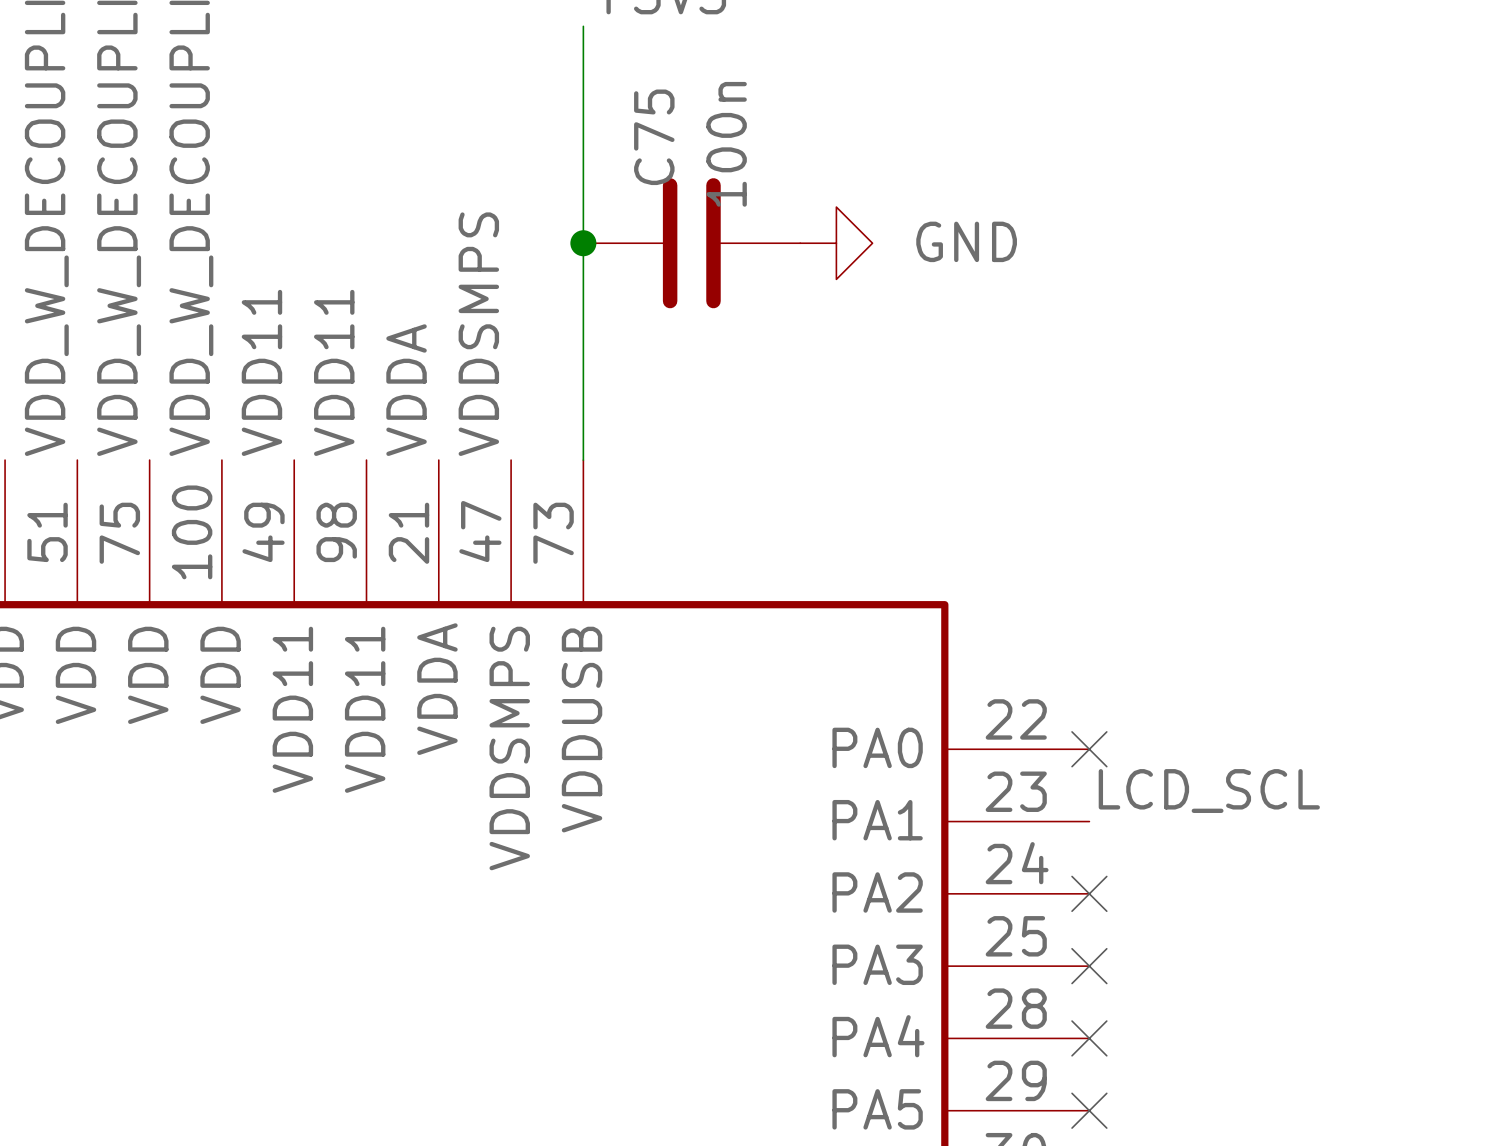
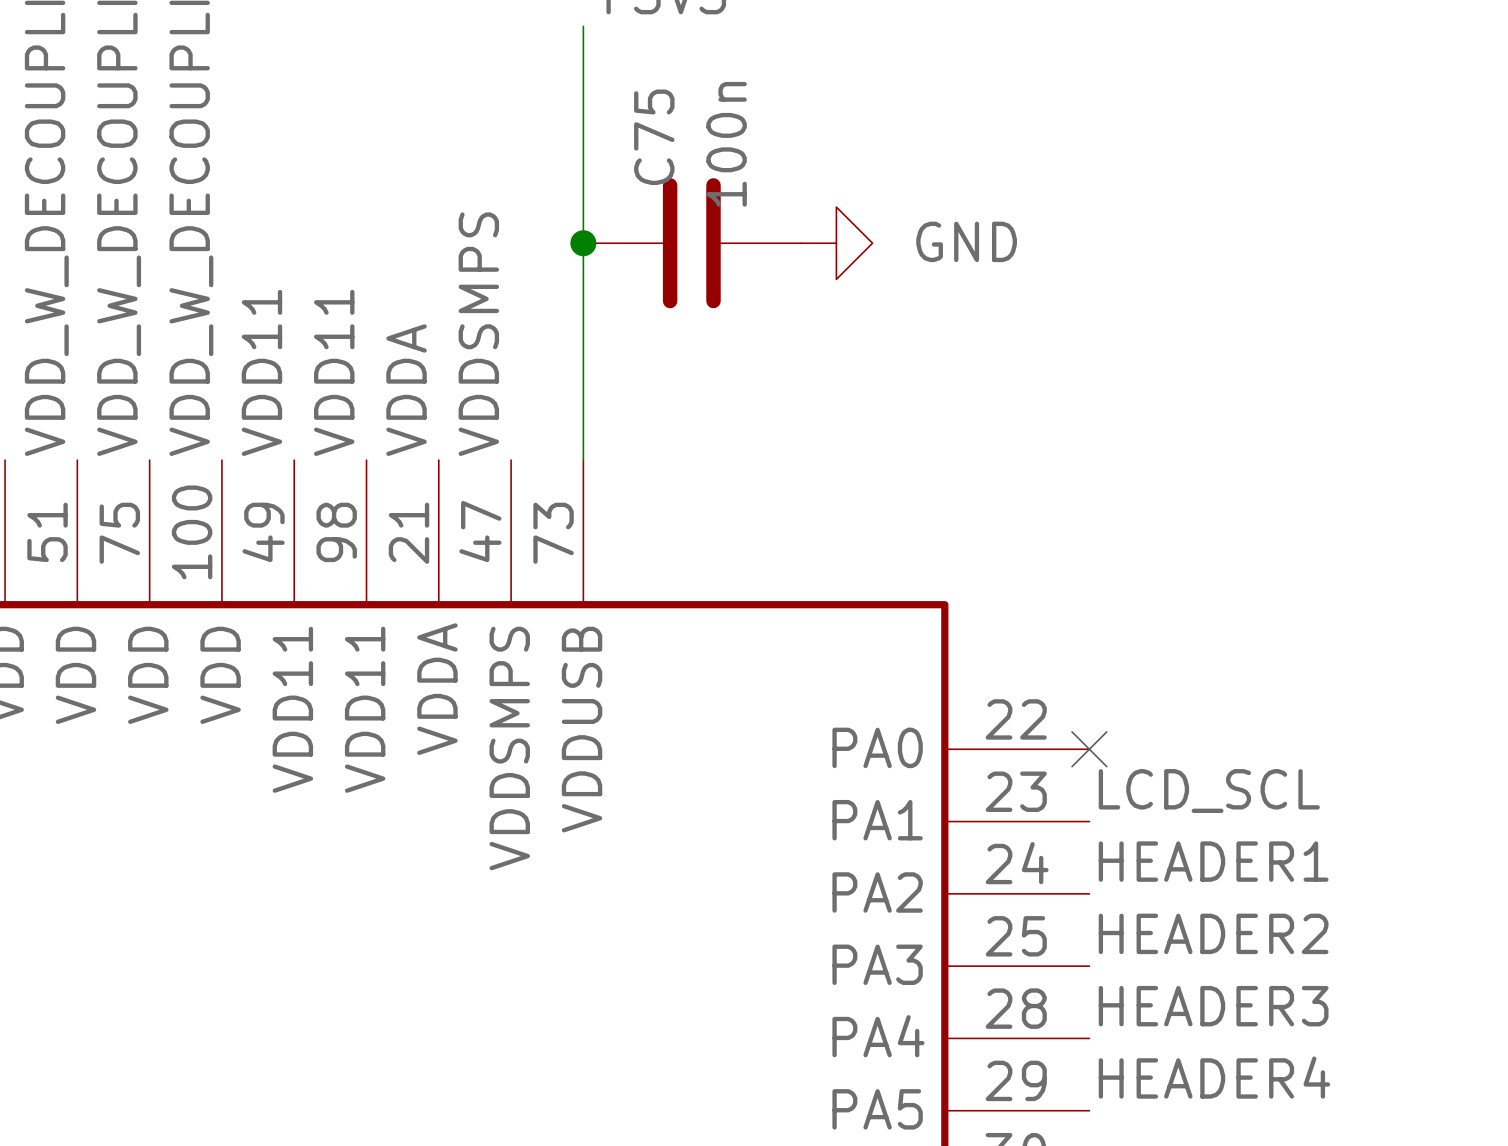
label: none -> HEADER1 (1213, 861)
no-connect mark: (1089, 893) -> none
label: none -> HEADER2 (1213, 933)
no-connect mark: (1089, 966) -> none
label: none -> HEADER3 (1213, 1006)
no-connect mark: (1089, 1038) -> none
label: none -> HEADER4 (1214, 1077)
no-connect mark: (1089, 1110) -> none

